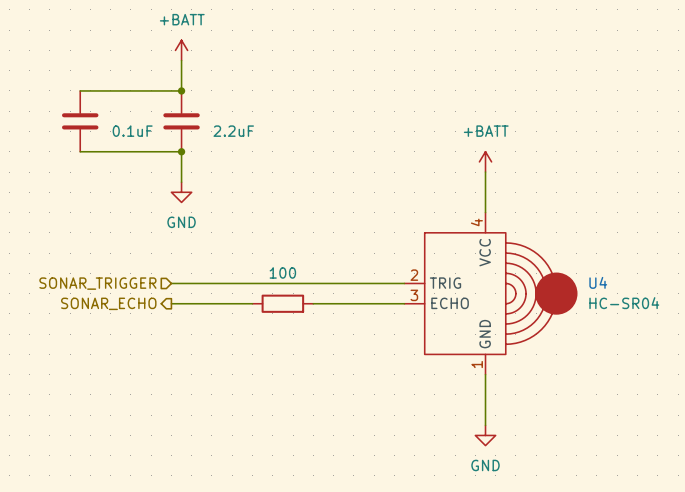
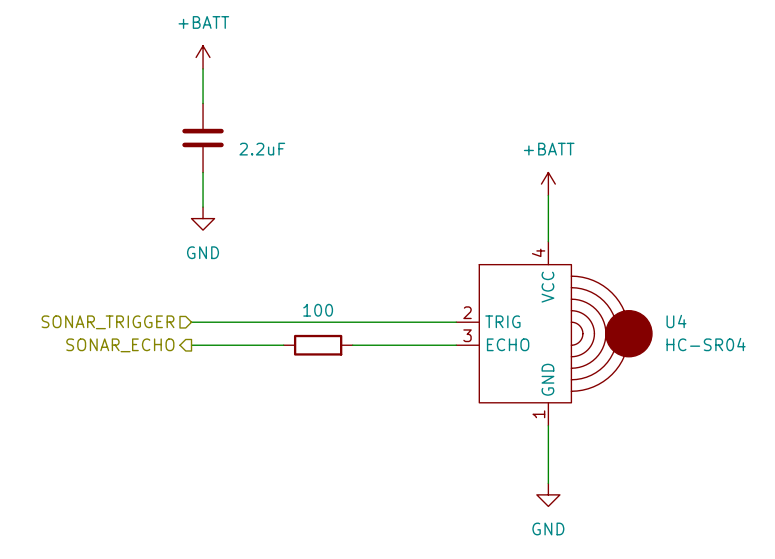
wire: (80, 90) (181, 90) -> none
junction: (181, 90) -> none
part: 0.1uF (80, 121) -> none
wire: (80, 151) (181, 151) -> none
junction: (181, 151) -> none

